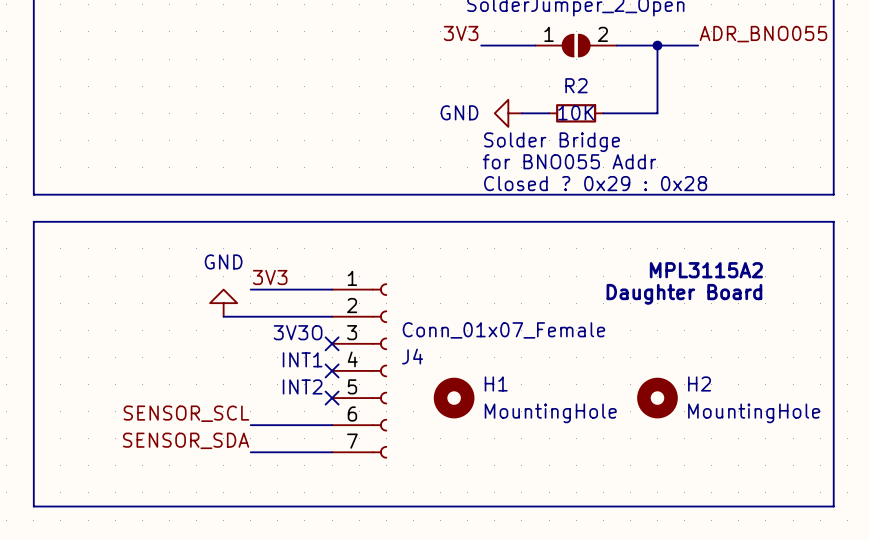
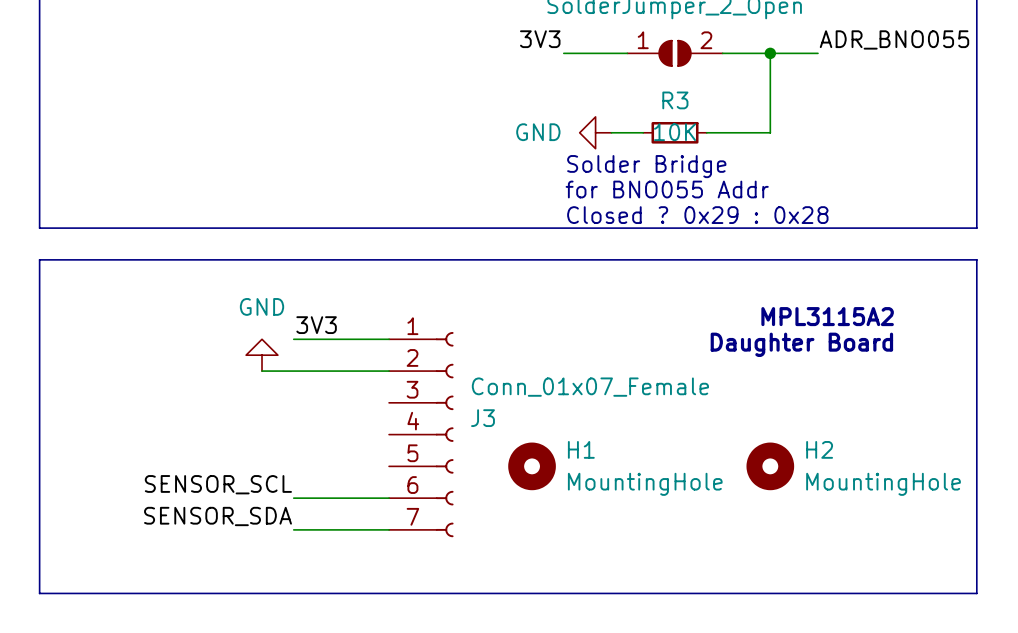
R2 name: R2 (576, 85) -> R3 (675, 100)
text: 3V3O (298, 332) -> none
no-connect mark: (332, 343) -> none
J4 name: J4 (412, 356) -> J3 (483, 418)
text: INT1 (302, 359) -> none
no-connect mark: (332, 370) -> none
text: INT2 (302, 386) -> none
no-connect mark: (332, 398) -> none

